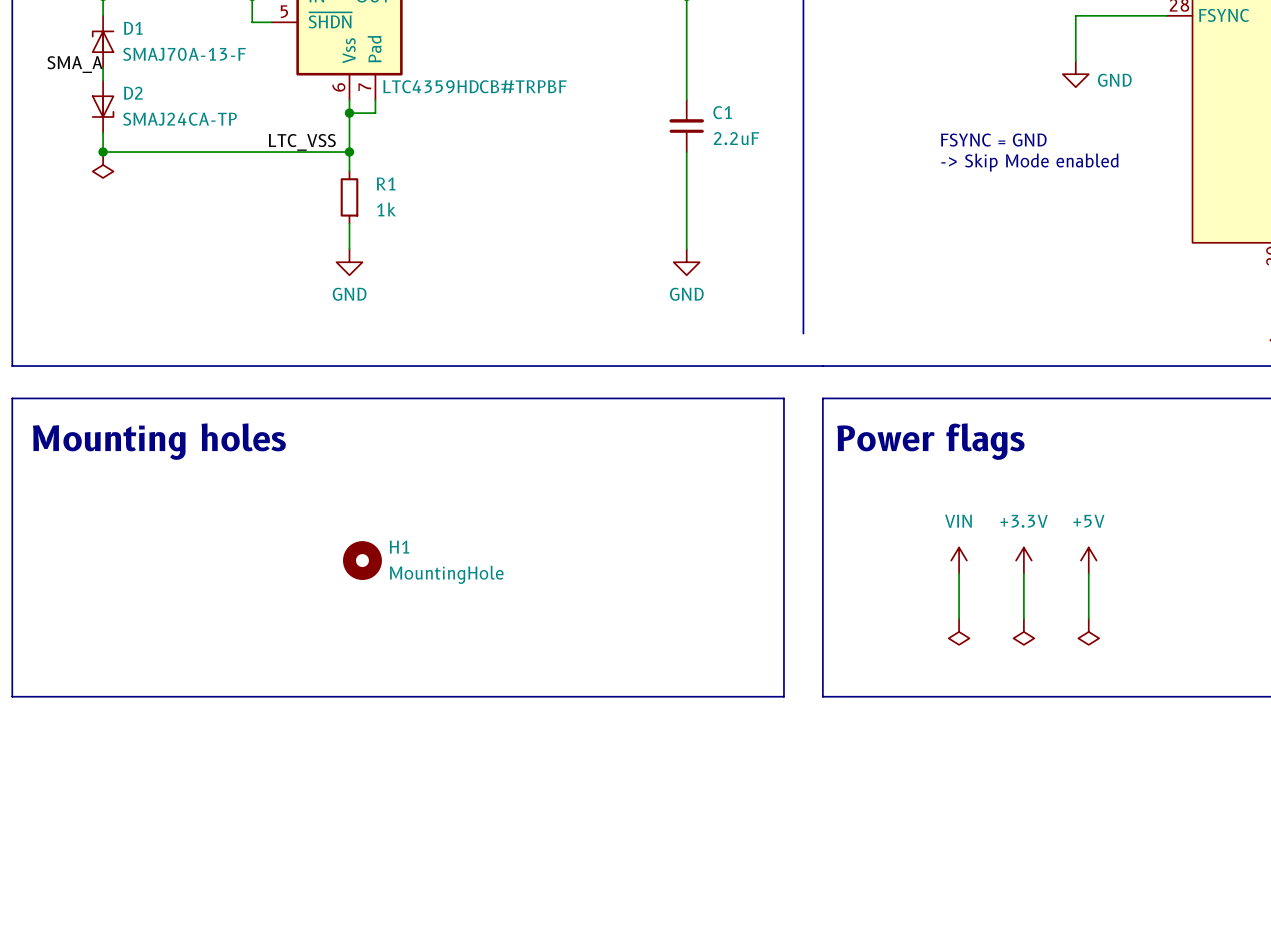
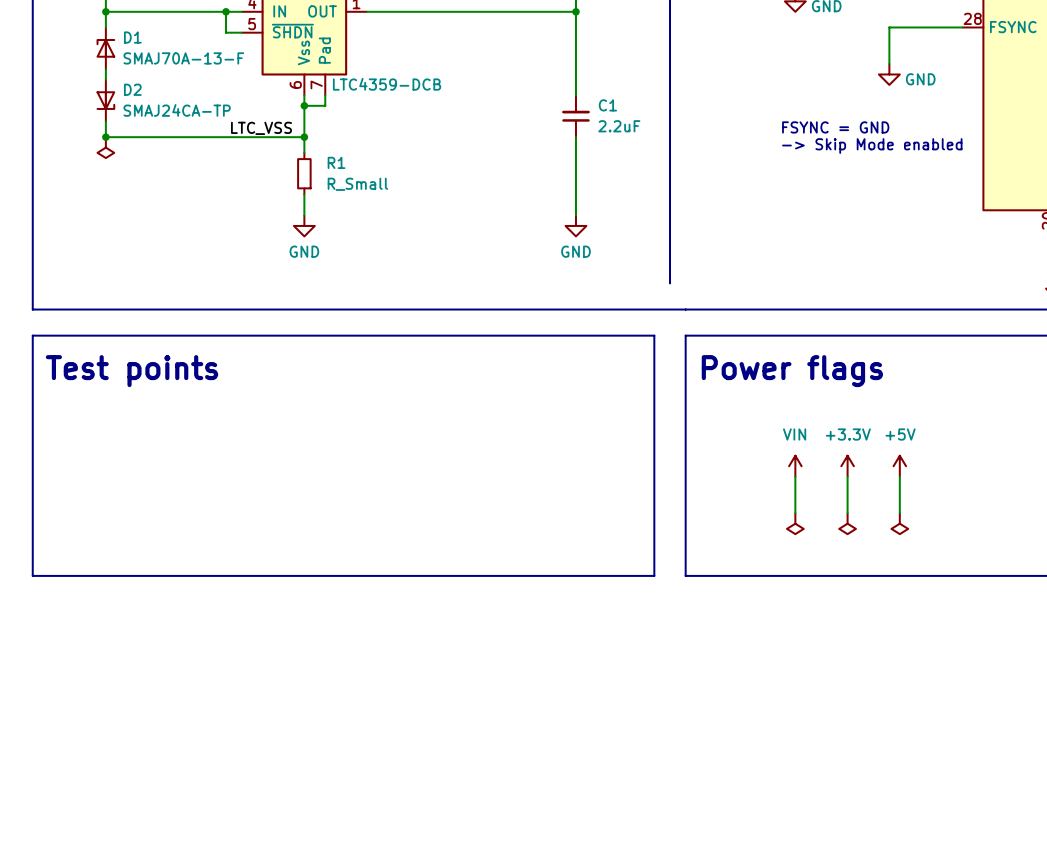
label: SMA_A (74, 64) -> none
part value: LTC4359HDCB#TRPBF (474, 86) -> LTC4359-DCB (387, 84)
R1 value: 1k (386, 209) -> R_Small (357, 184)
text: Mounting holes (159, 441) -> Test points (132, 371)
H1: MountingHole (362, 560) -> none

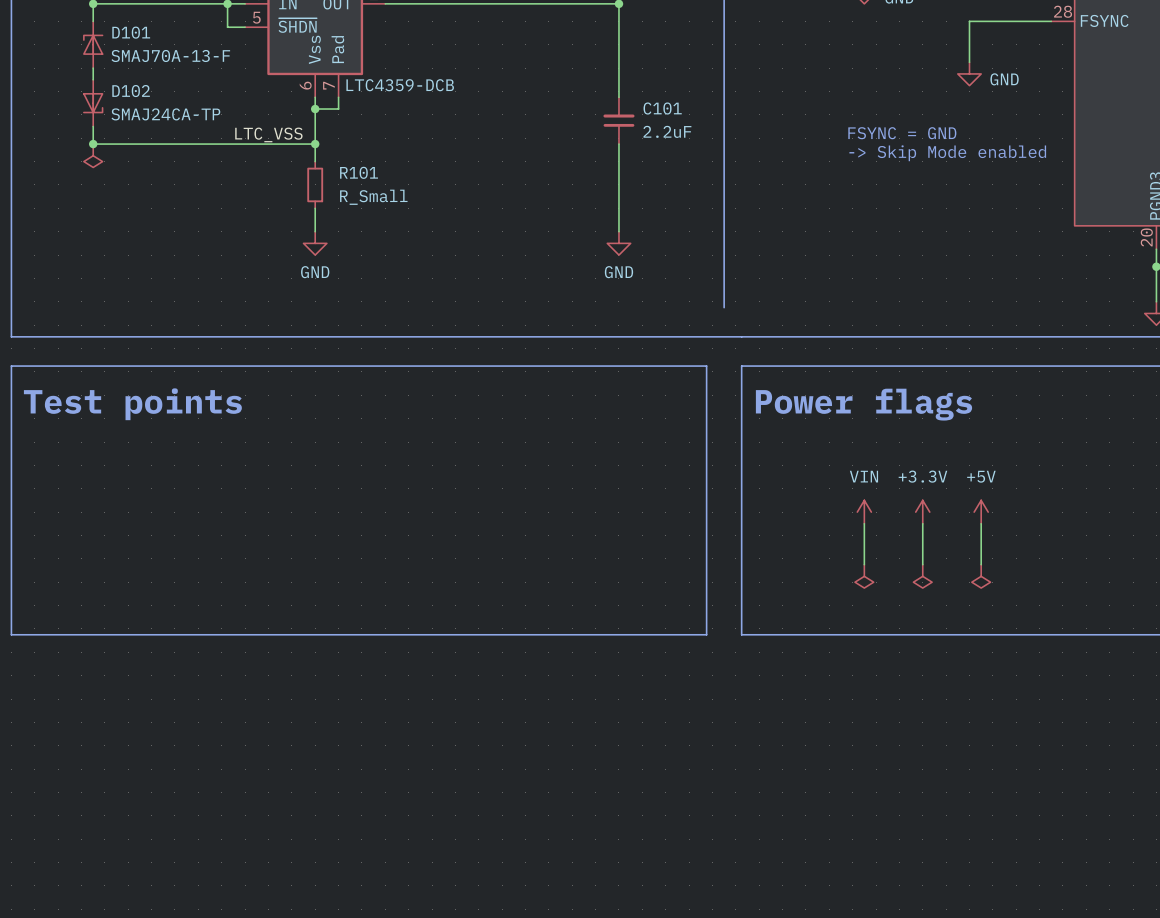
D1 name: D1 (132, 37) -> D101 (131, 32)
D2 name: D2 (132, 89) -> D102 (131, 91)
C1 name: C1 (607, 105) -> C101 (662, 108)
R1 name: R1 (336, 162) -> R101 (359, 172)

